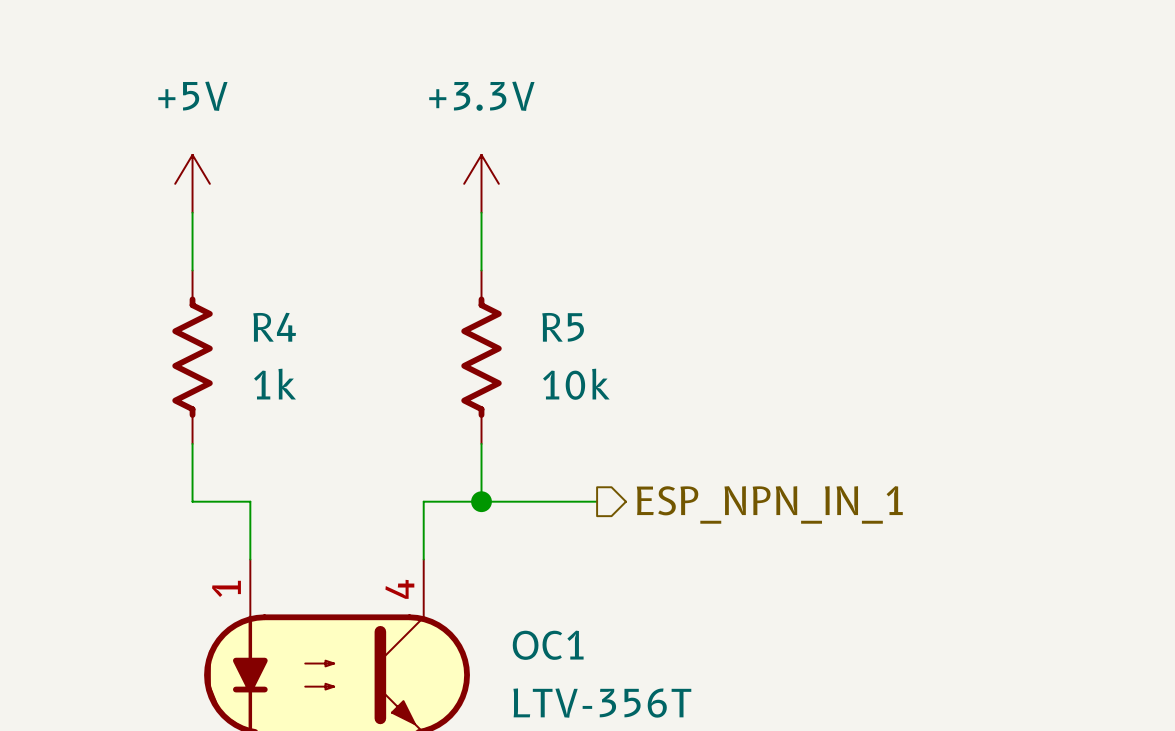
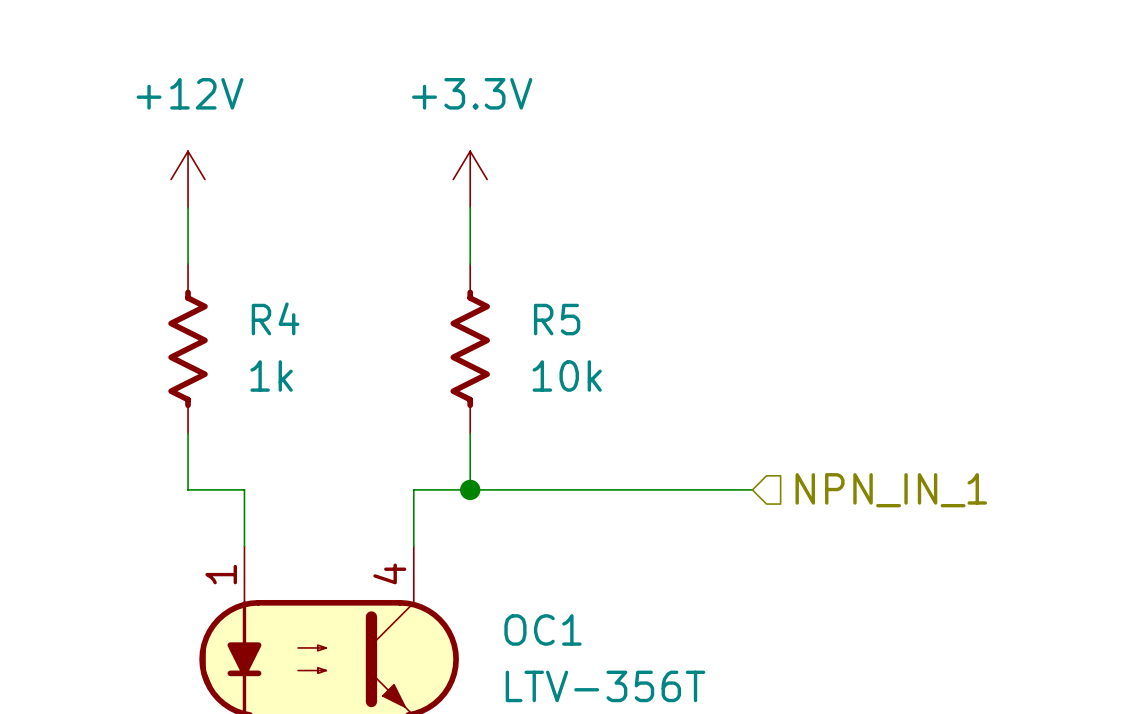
power symbol: +5V (192, 183) -> +12V (188, 179)
wire: none -> (583, 489) (752, 489)
hierarchical label shape: output (769, 504) -> input (891, 490)
hierarchical label: ESP_NPN_IN_1 (769, 504) -> NPN_IN_1 (891, 490)

